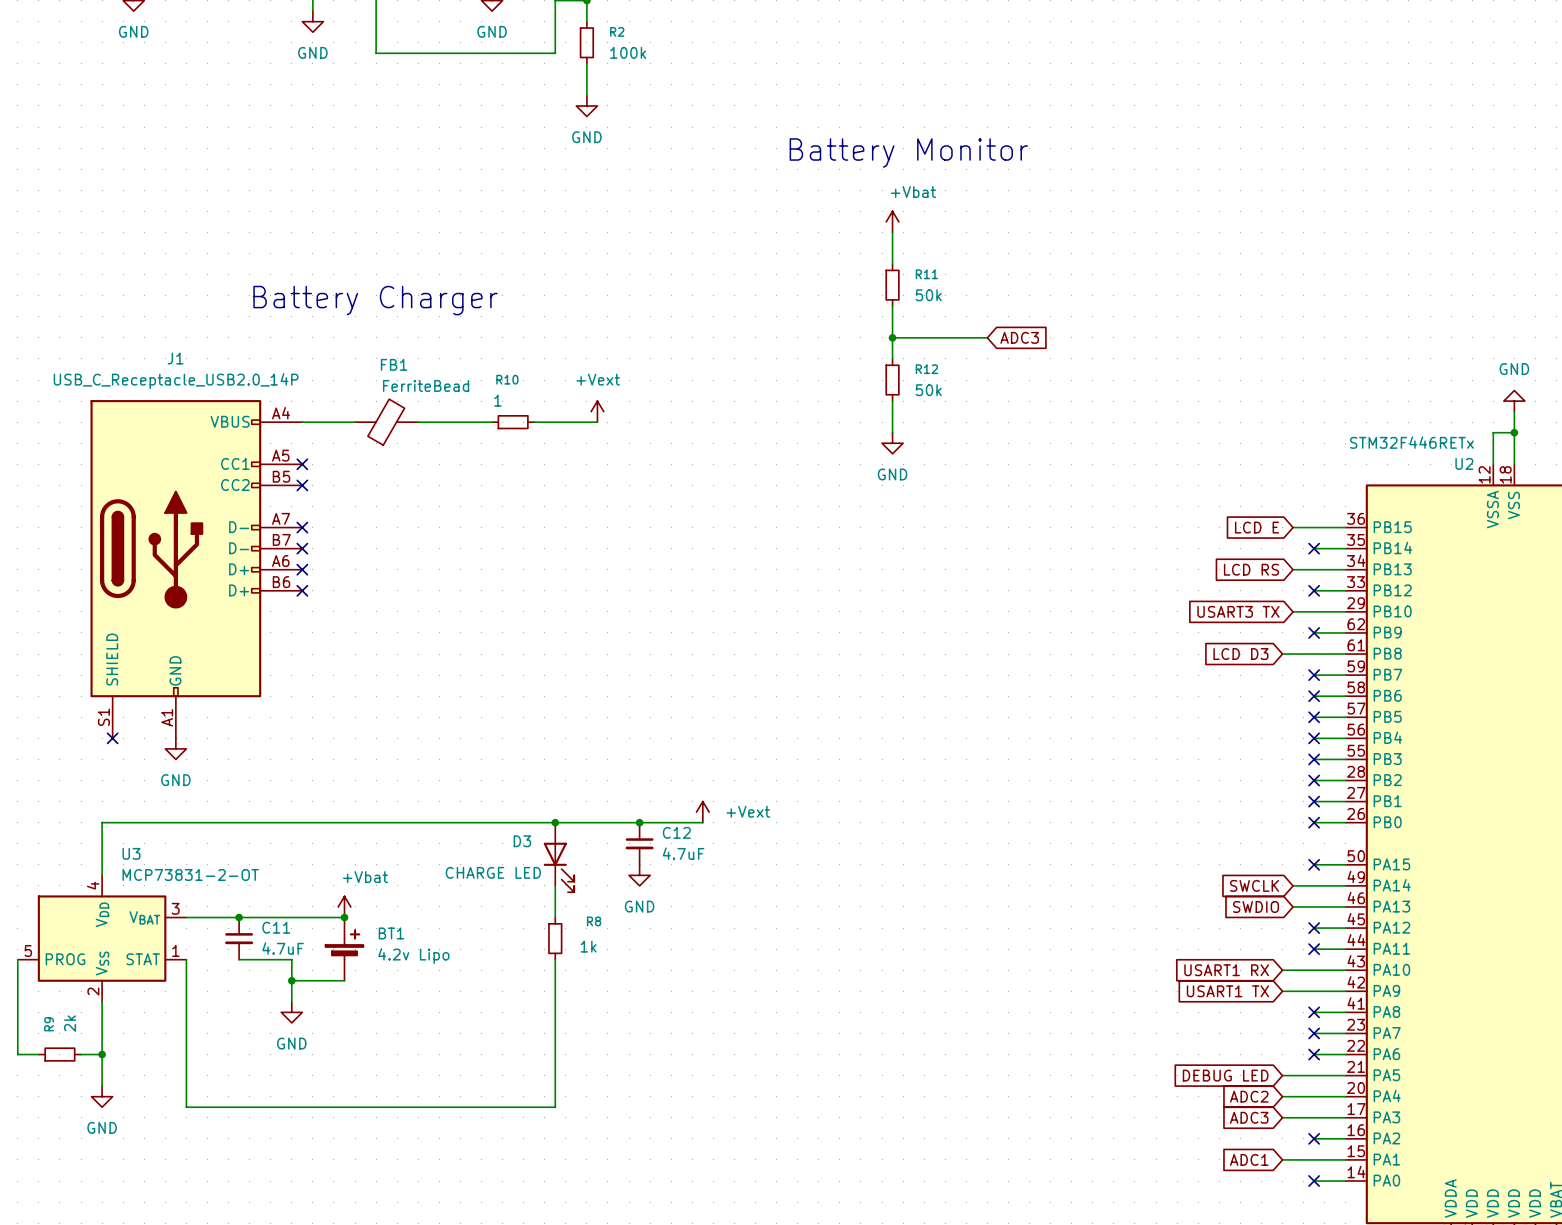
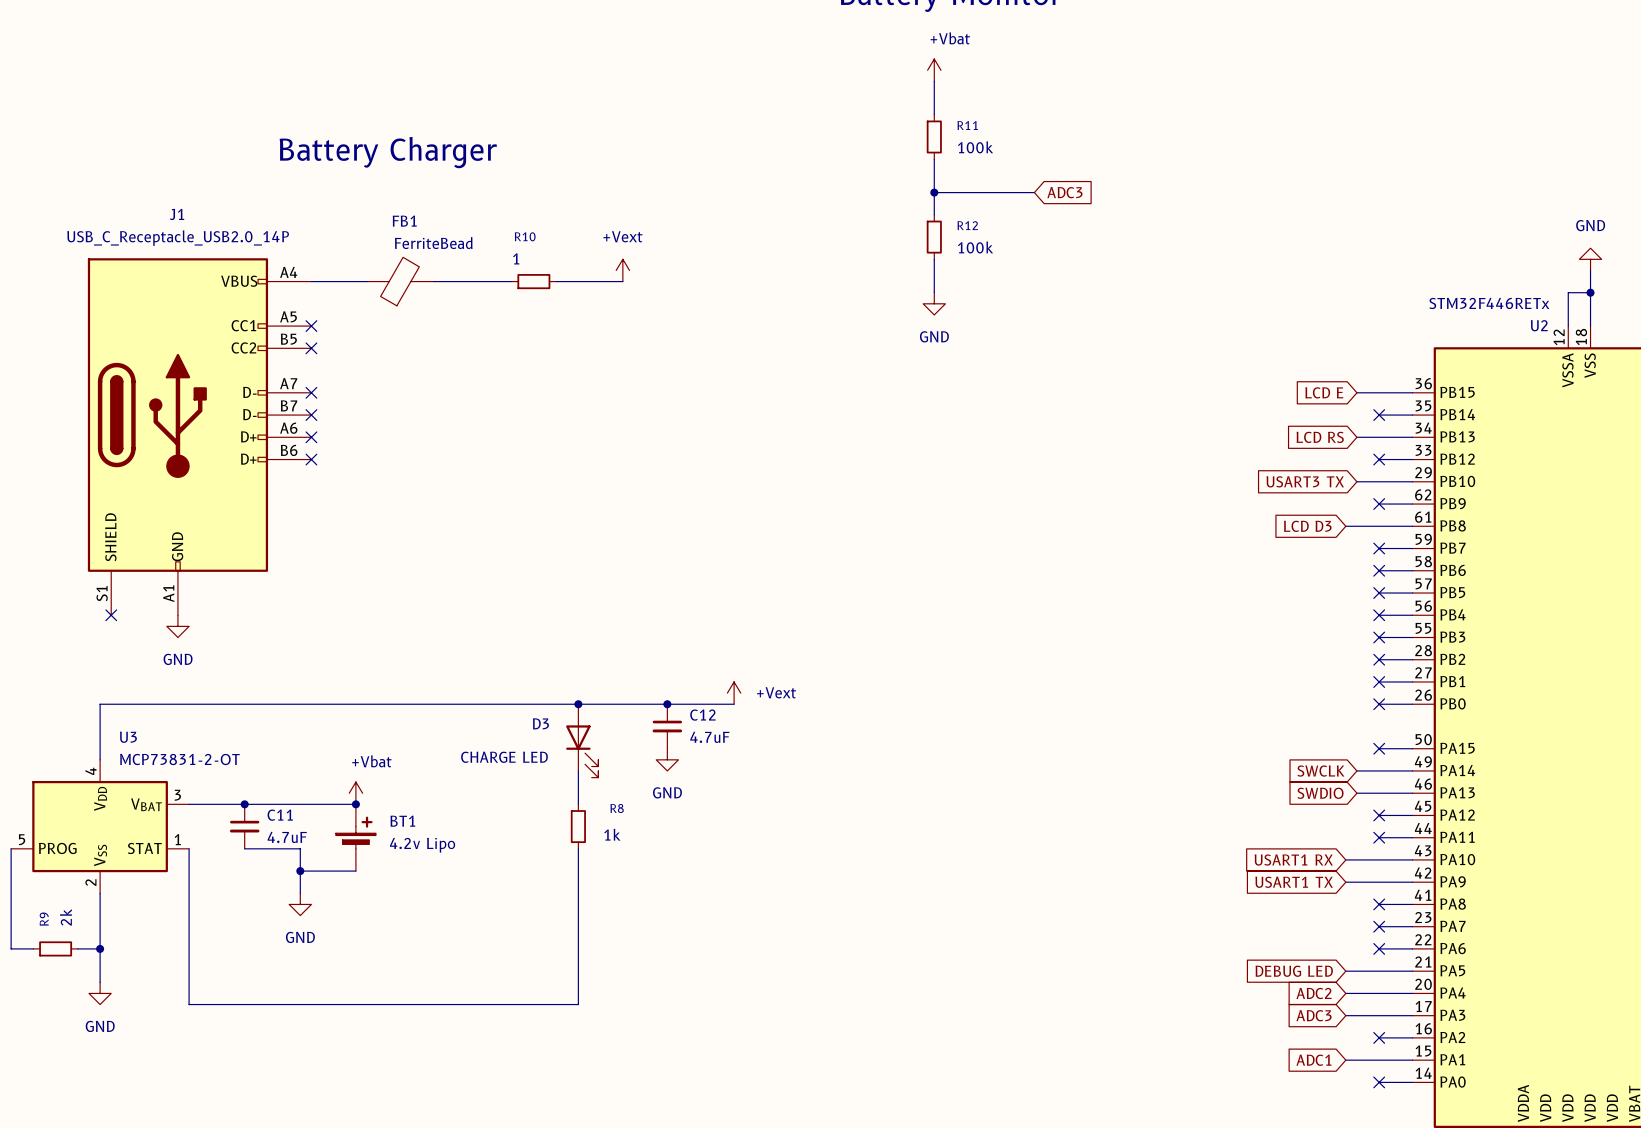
R11 value: 50k (928, 295) -> 100k (975, 147)
R12 value: 50k (928, 390) -> 100k (975, 247)

